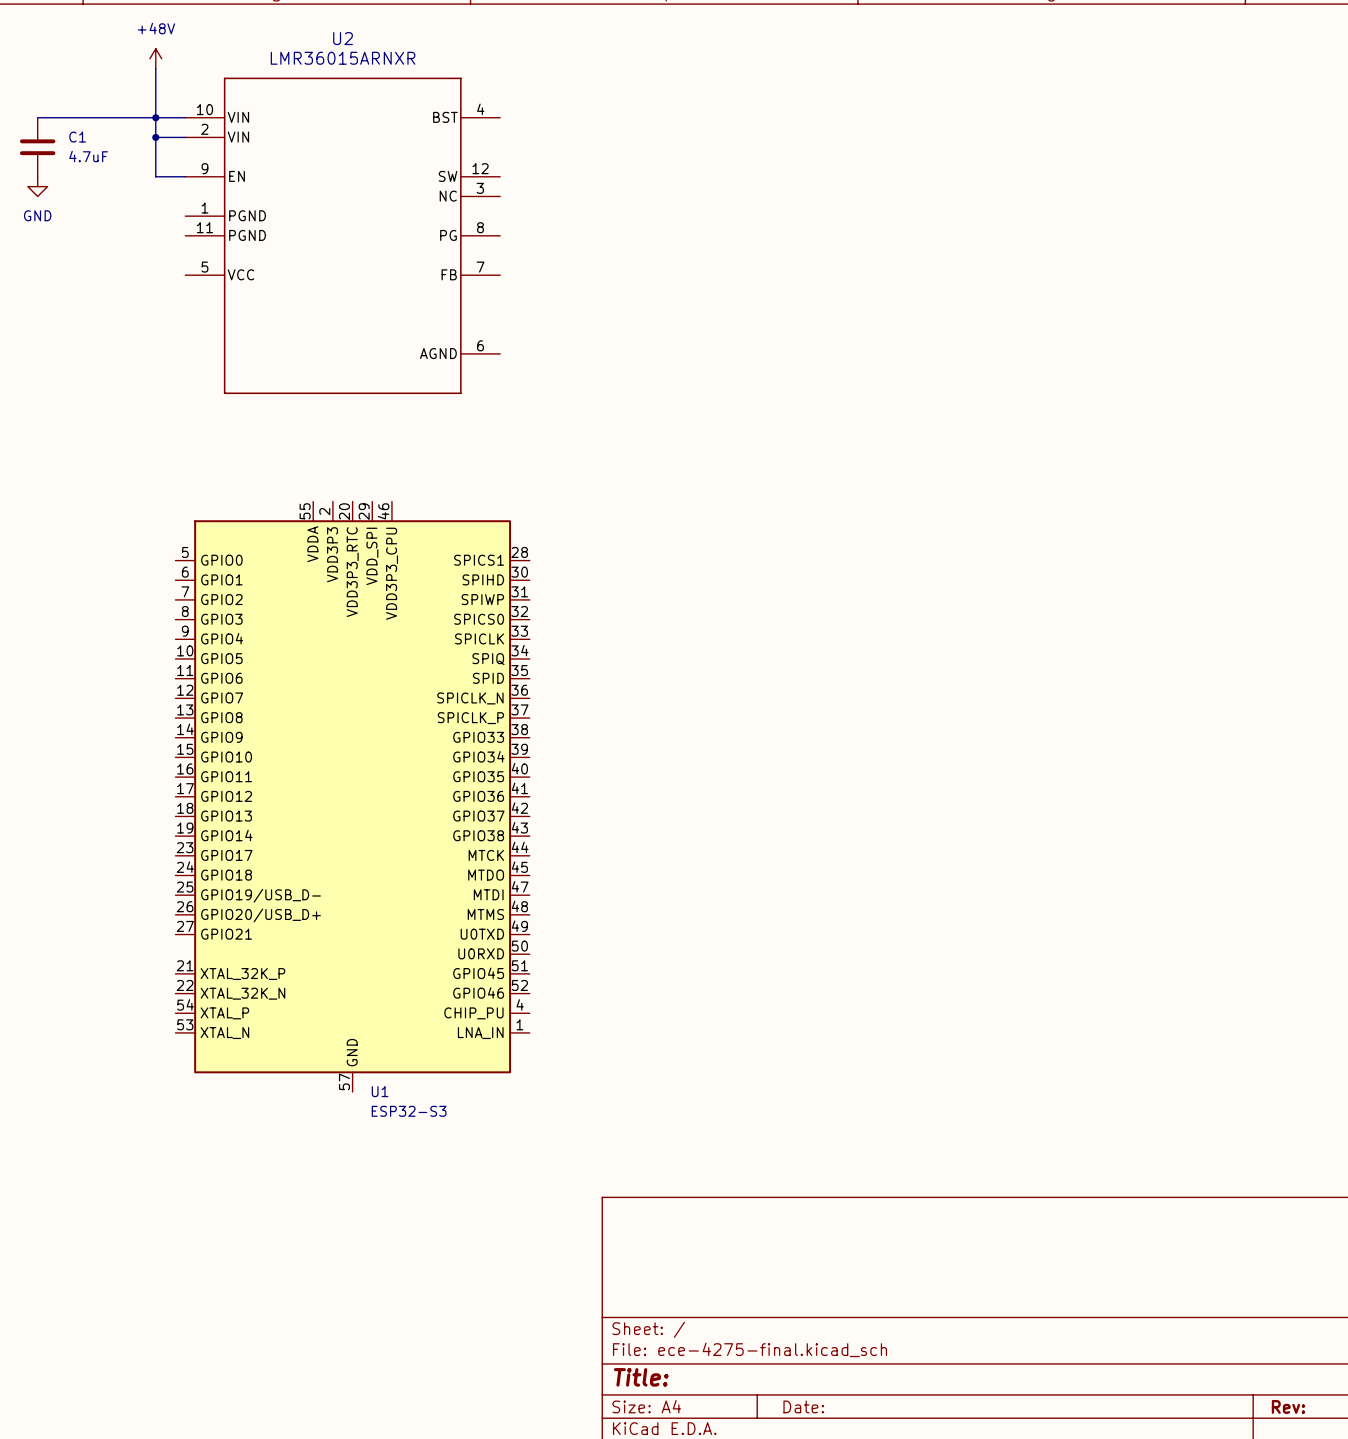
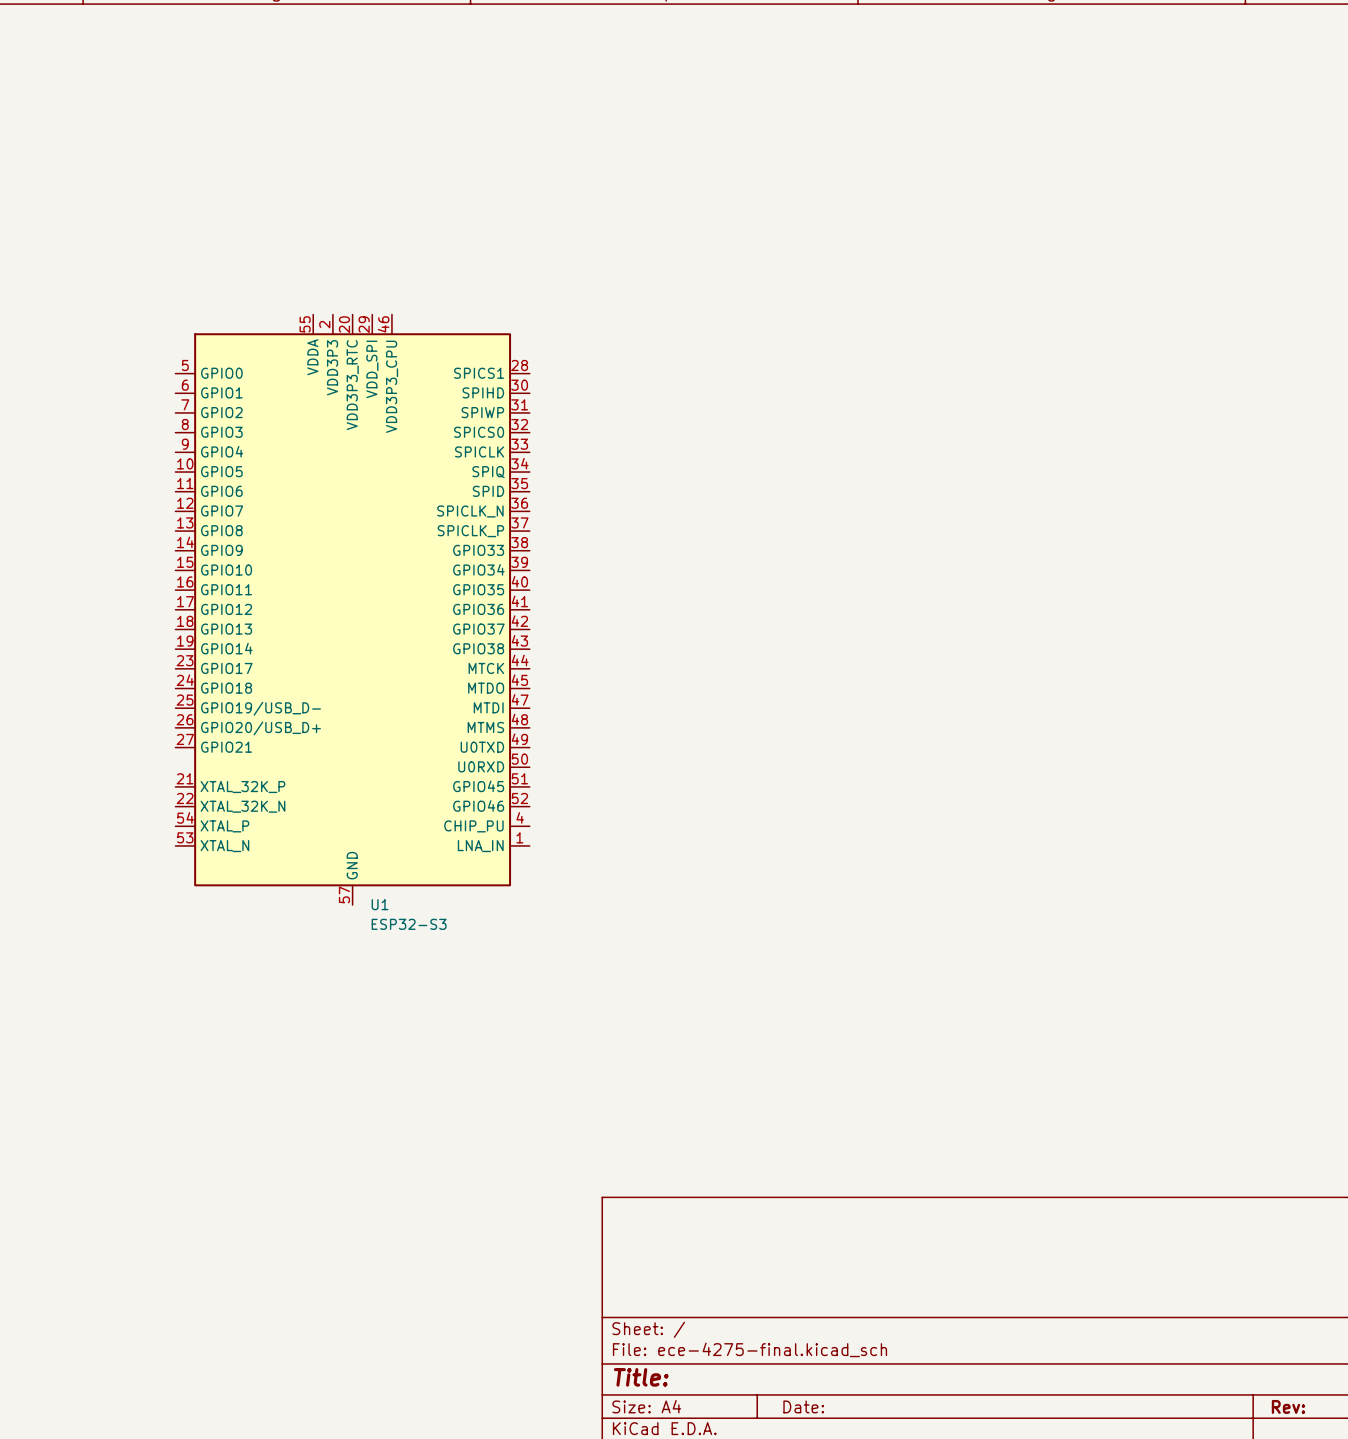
power symbol: +48V (155, 58) -> none
wire: (155, 68) (155, 176) (185, 176) -> none
wire: (37, 117) (185, 117) -> none
junction: (155, 117) -> none
wire: (155, 137) (185, 137) -> none
junction: (155, 137) -> none
C1: 4.7uF (37, 147) -> none
power symbol: GND (37, 186) -> none
U2: LMR36015ARNXR (342, 235) -> none
U1 position: (352, 796) -> (352, 609)

